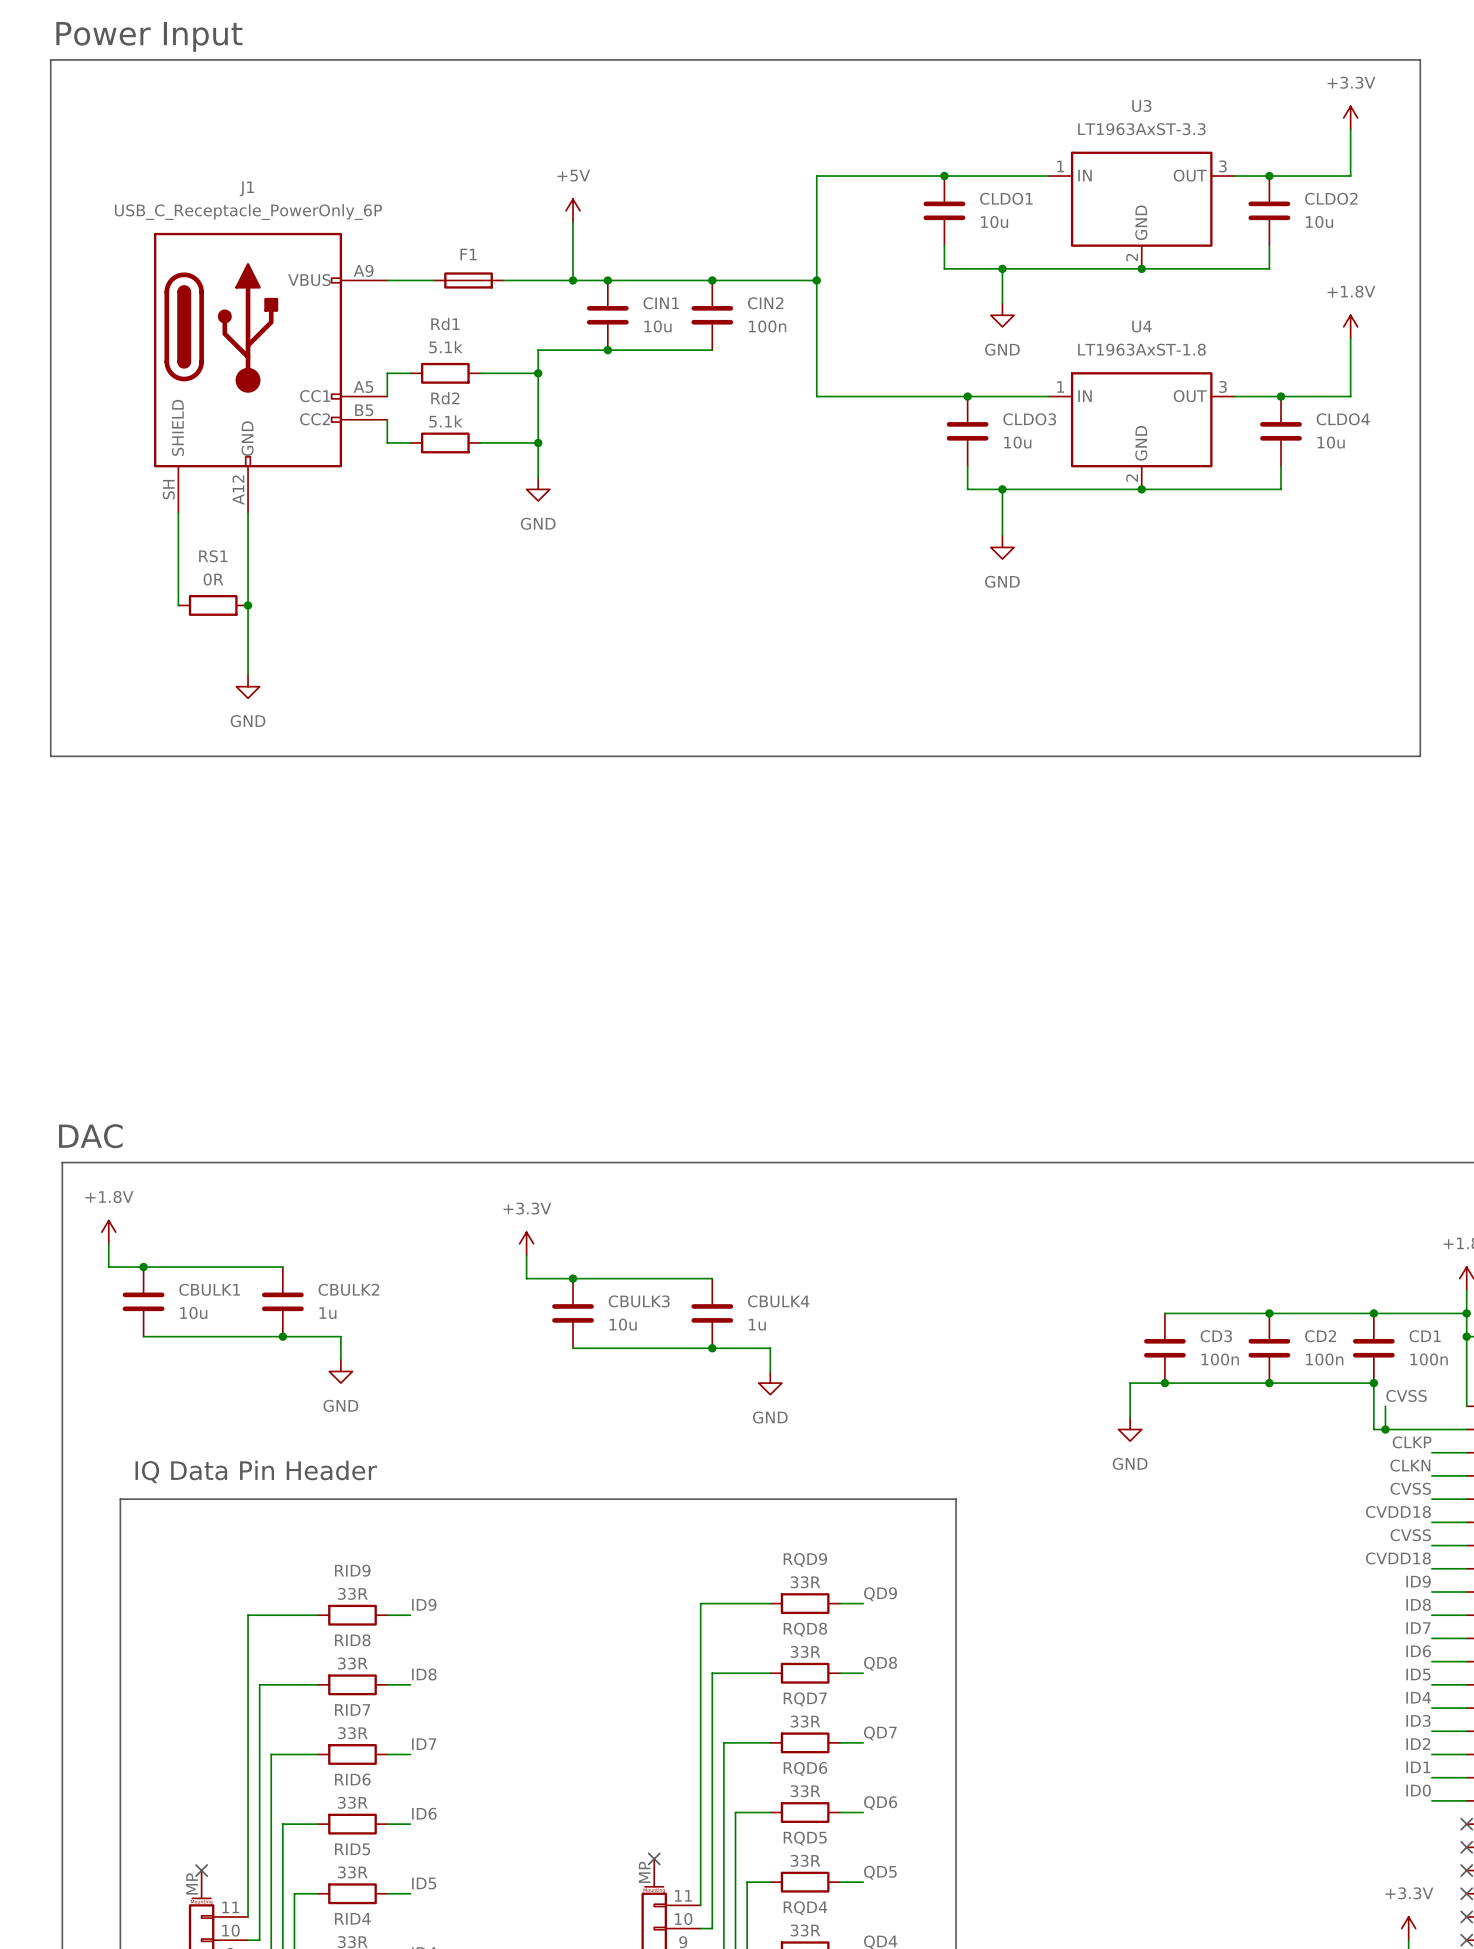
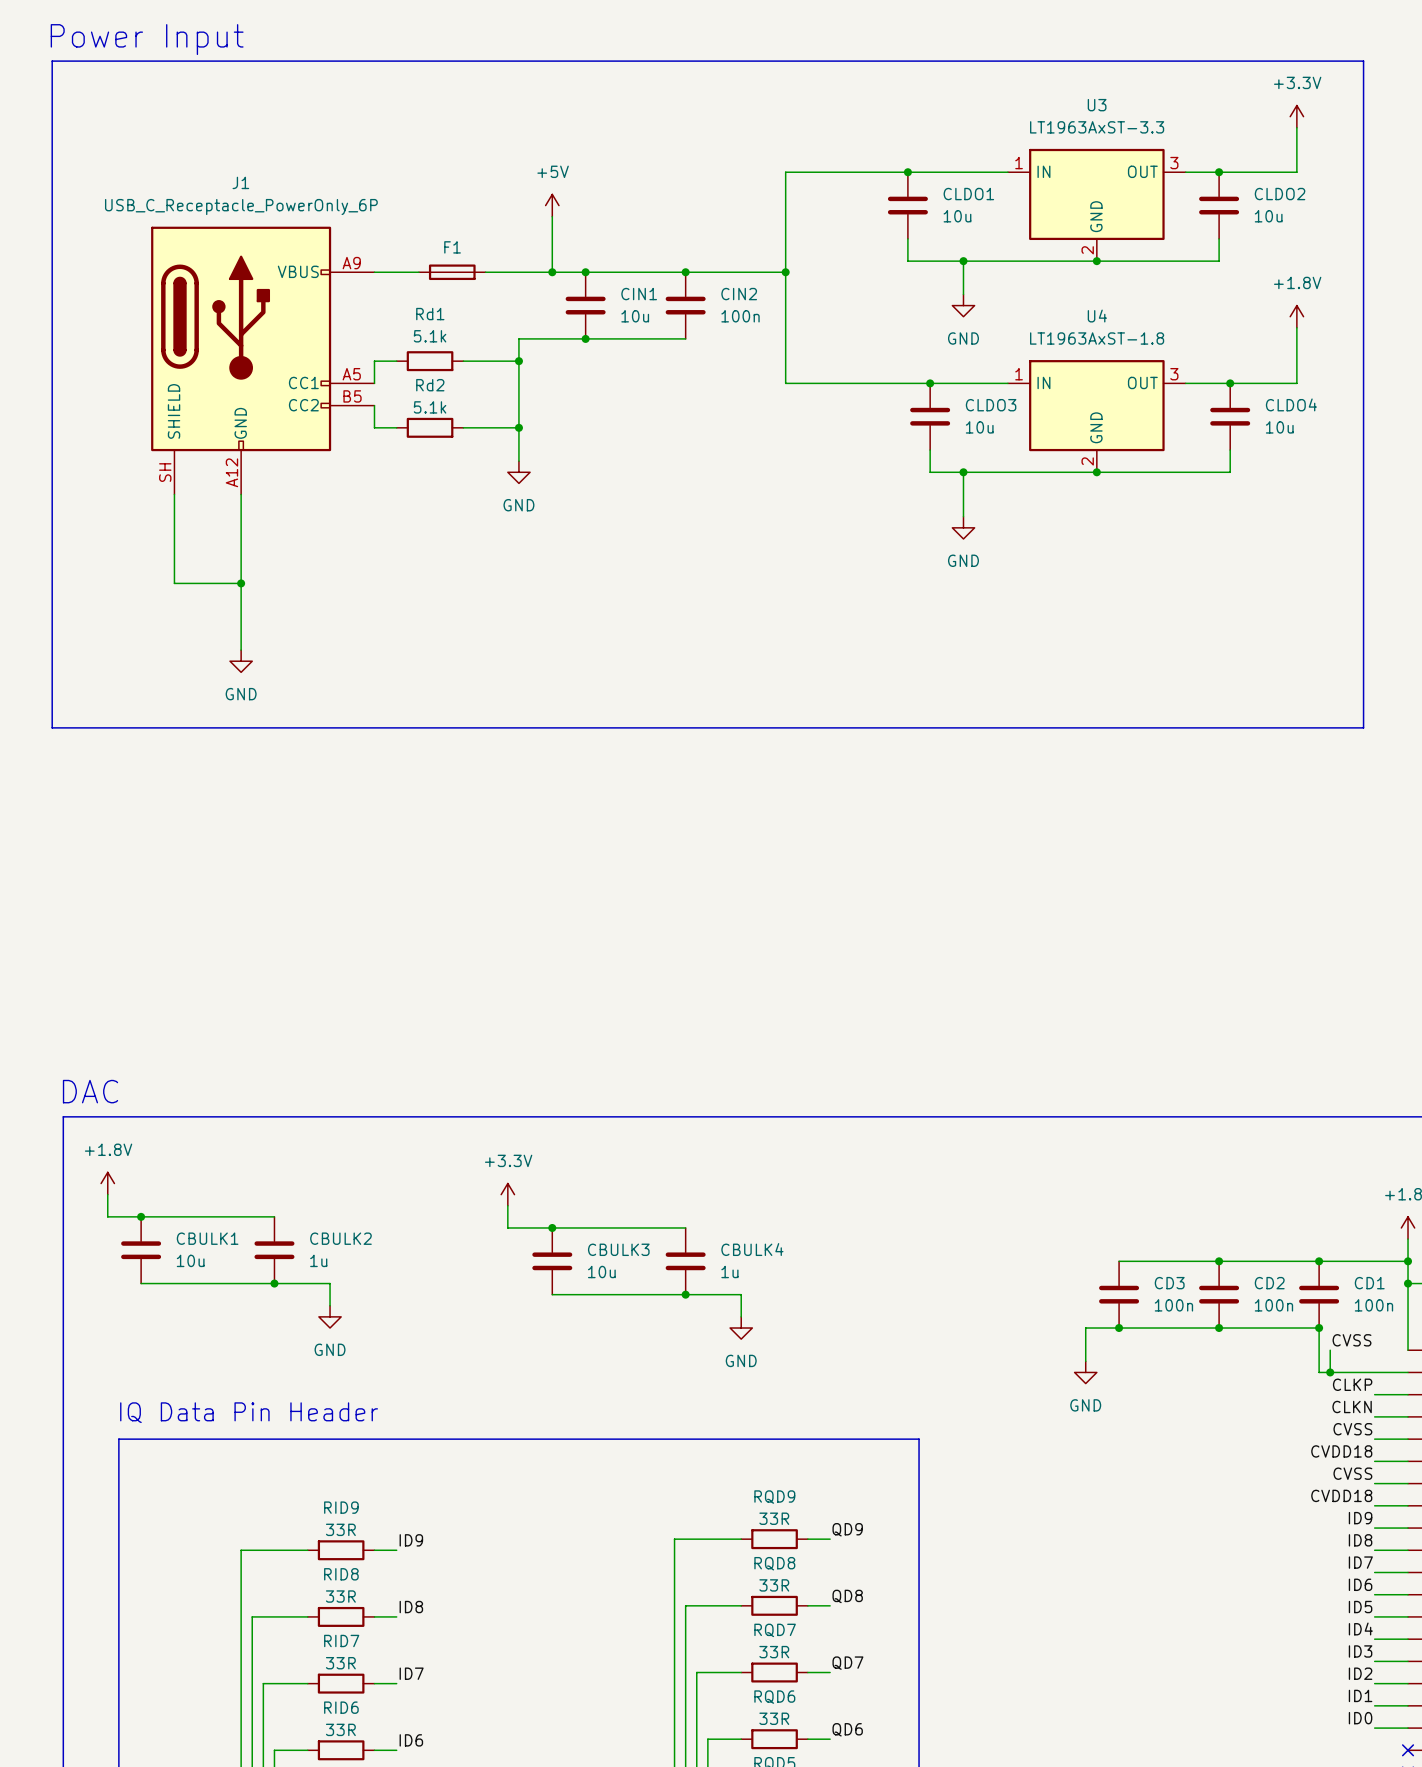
wire: none -> (174, 583) (241, 583)
RS1: 0R (213, 605) -> none

